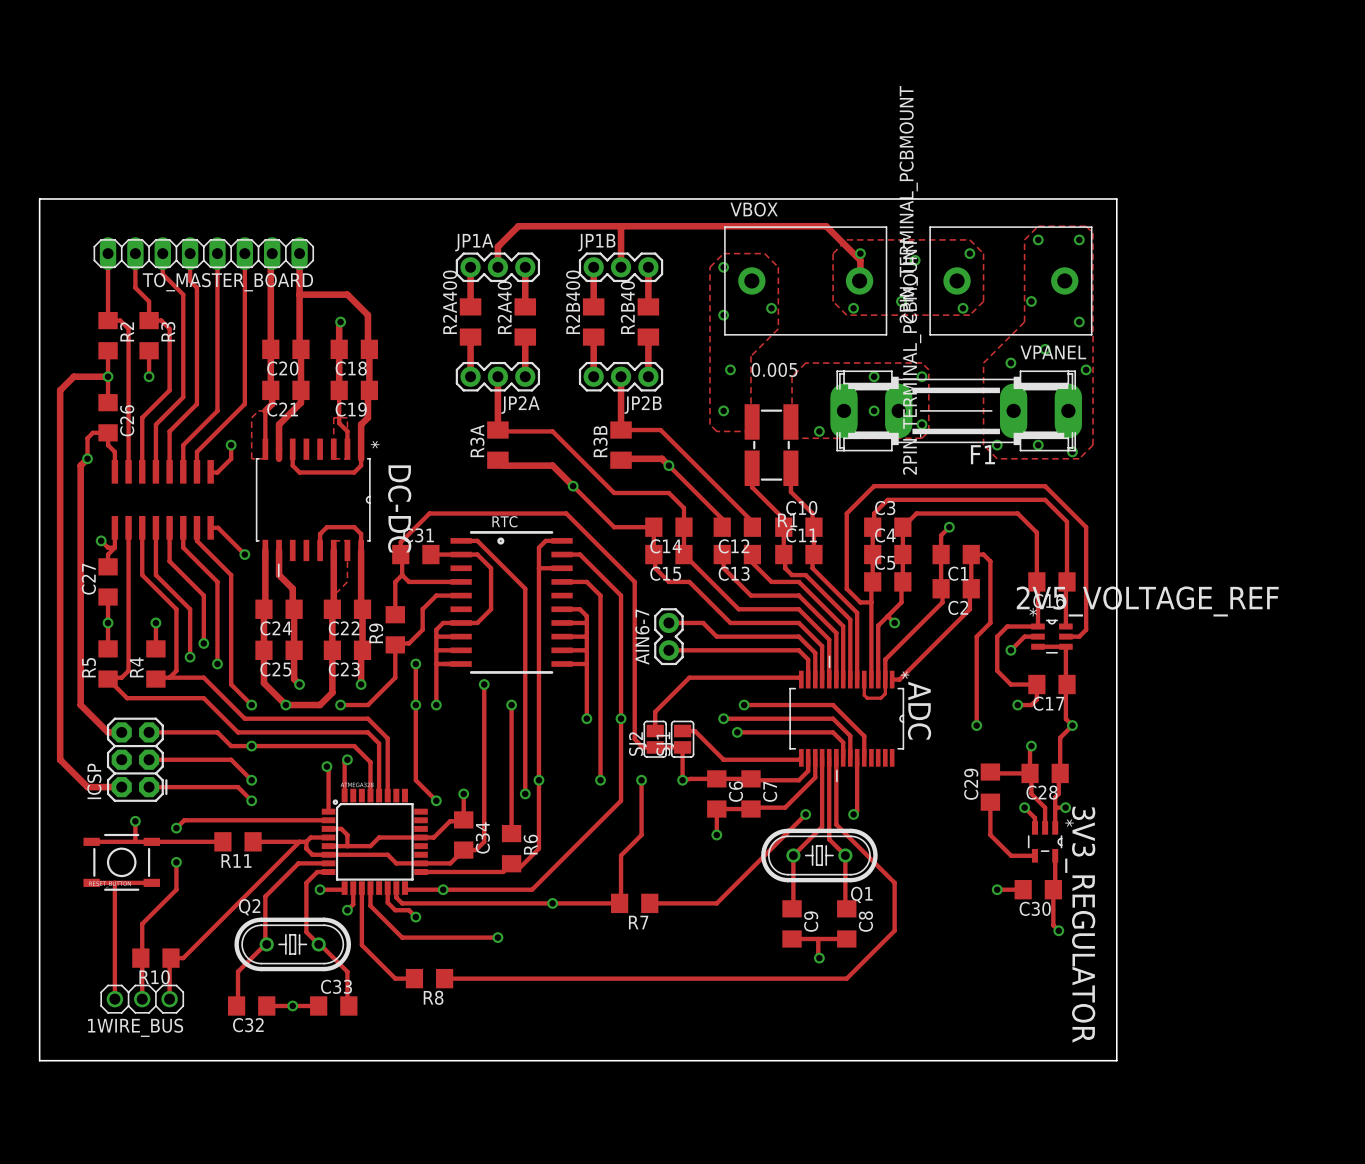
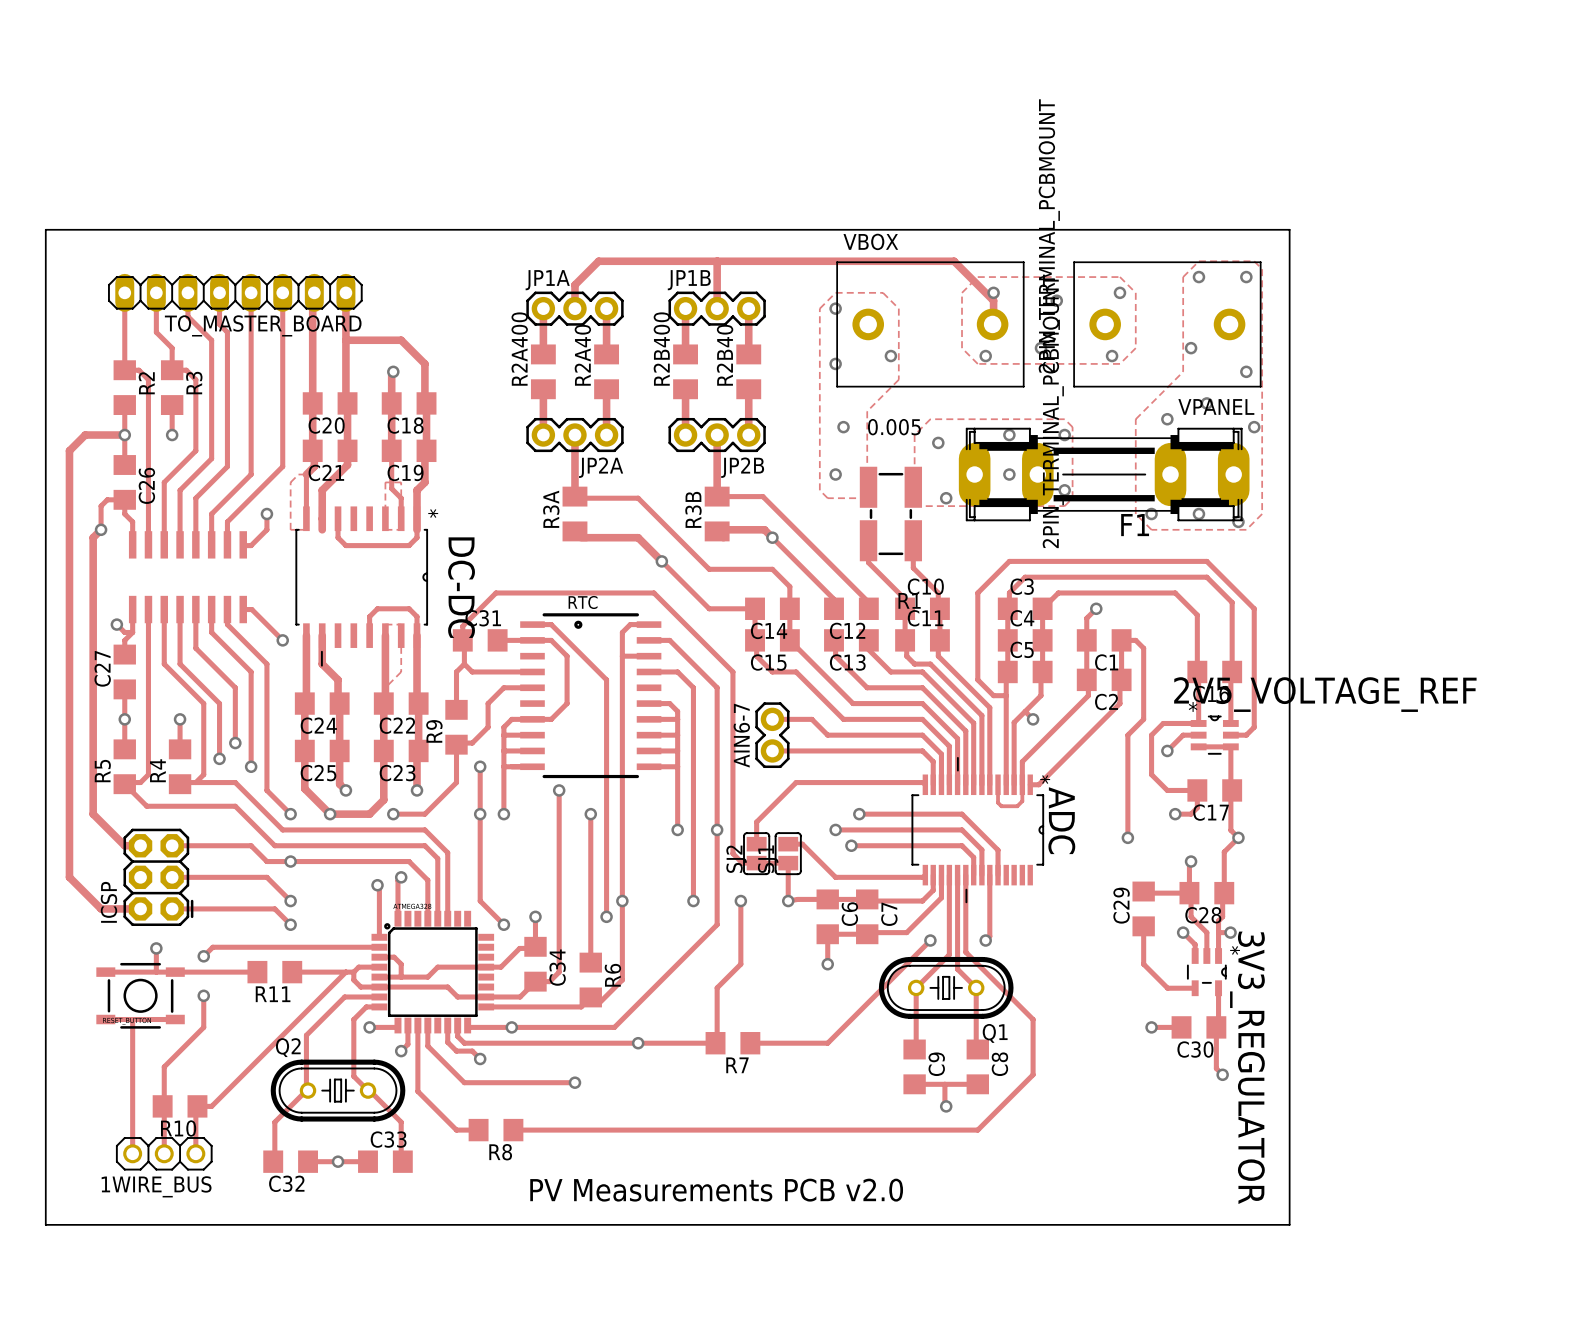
via: none -> (938, 442)
text: none -> PV Measurements PCB v2.0 (716, 1190)

